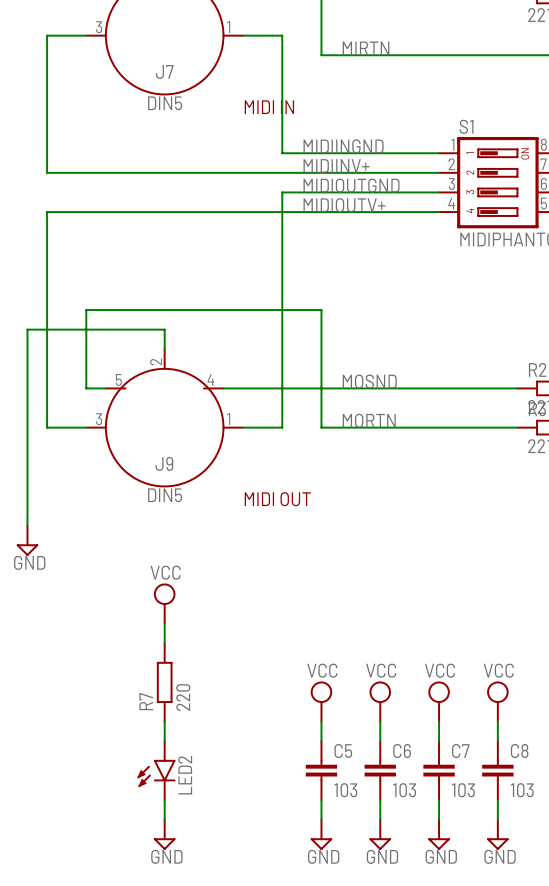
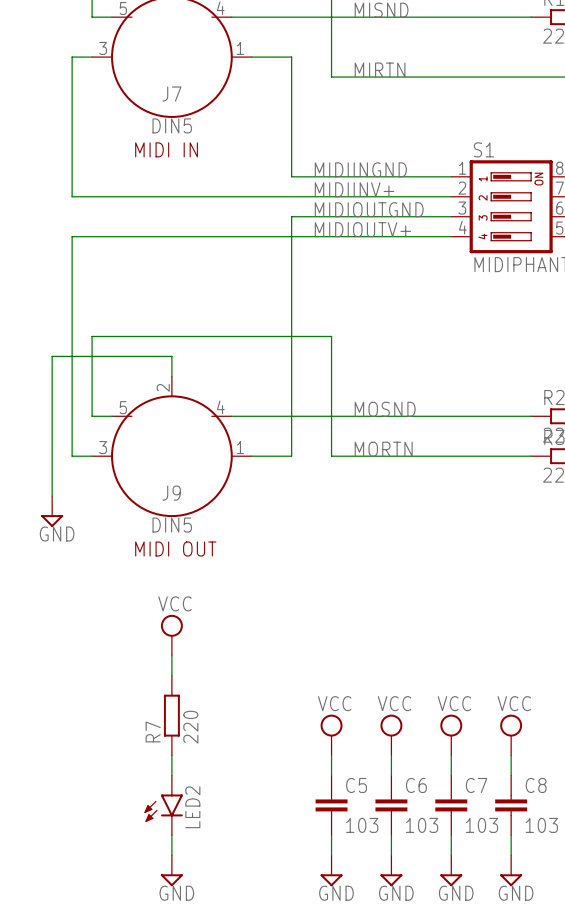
wire: (66, 35) (47, 35) (47, 172) (66, 172) -> (72, 57) (72, 196)
text position: MIDI IN (269, 107) -> MIDI IN (166, 149)
wire: (66, 212) (47, 212) (47, 329) (27, 329) (27, 525) -> (72, 236) (72, 456)
wire: (47, 427) (66, 427) -> (52, 456) (52, 496)
text position: MIDI OUT (277, 499) -> MIDI OUT (175, 549)
power symbol position: GND (27, 540) -> GND (52, 511)

